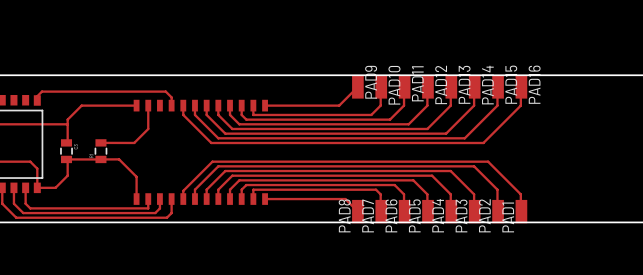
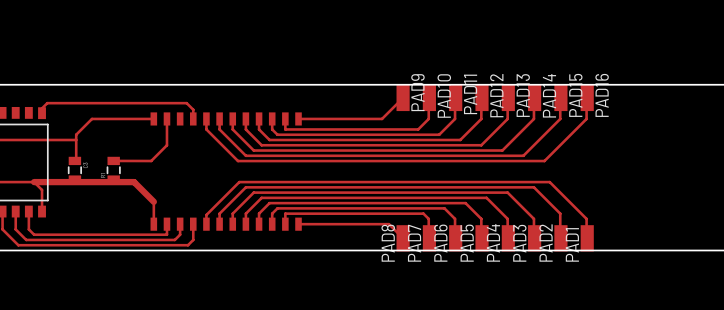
top track: (66, 159) (119, 159) (136, 176) (136, 179) -> (34, 182) (134, 182) (153, 201)
top track: (67, 160) (67, 175) (55, 187) (37, 187) -> none

